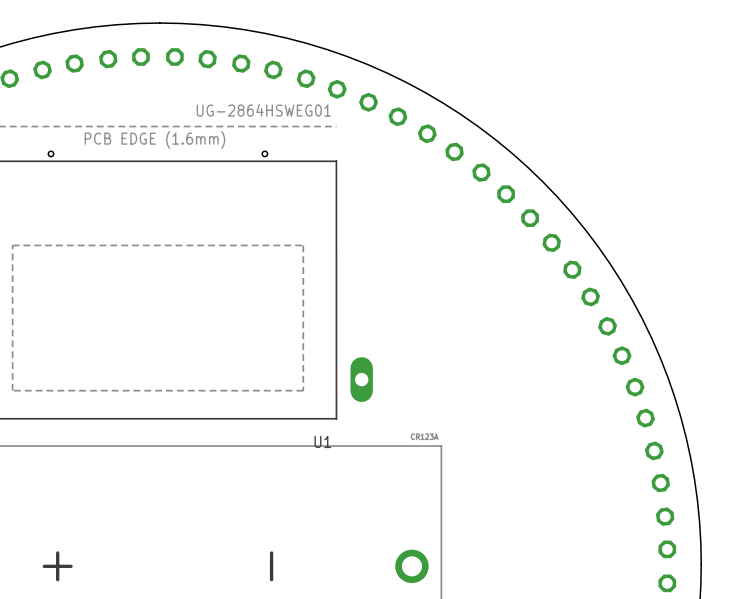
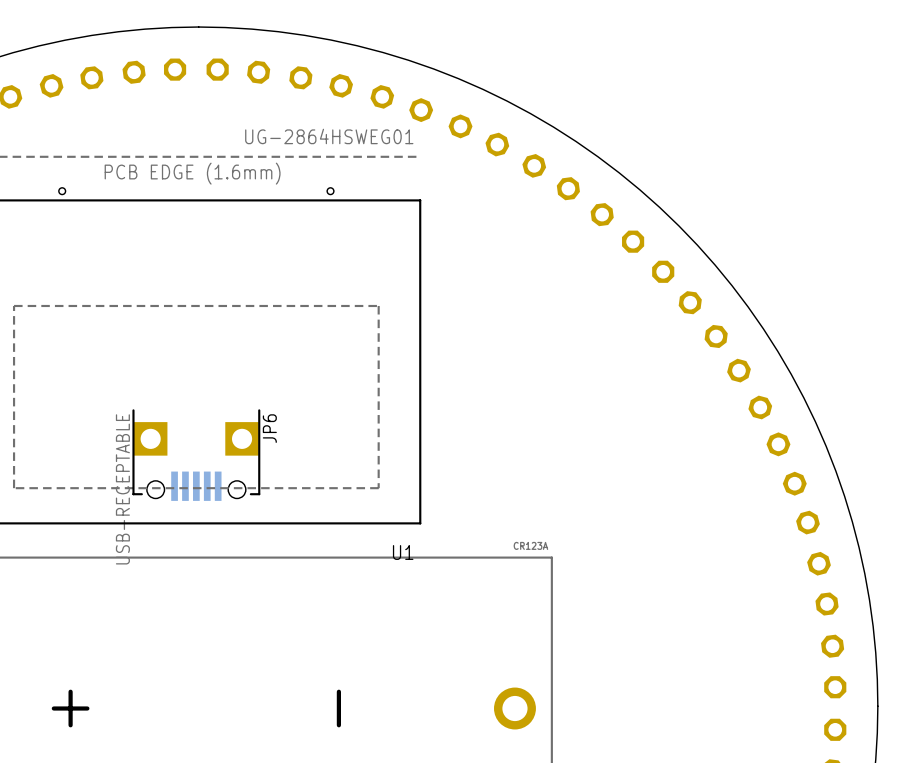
JP6: none -> USB-RECEPTABLE (196, 455)
part: (361, 379) -> none

